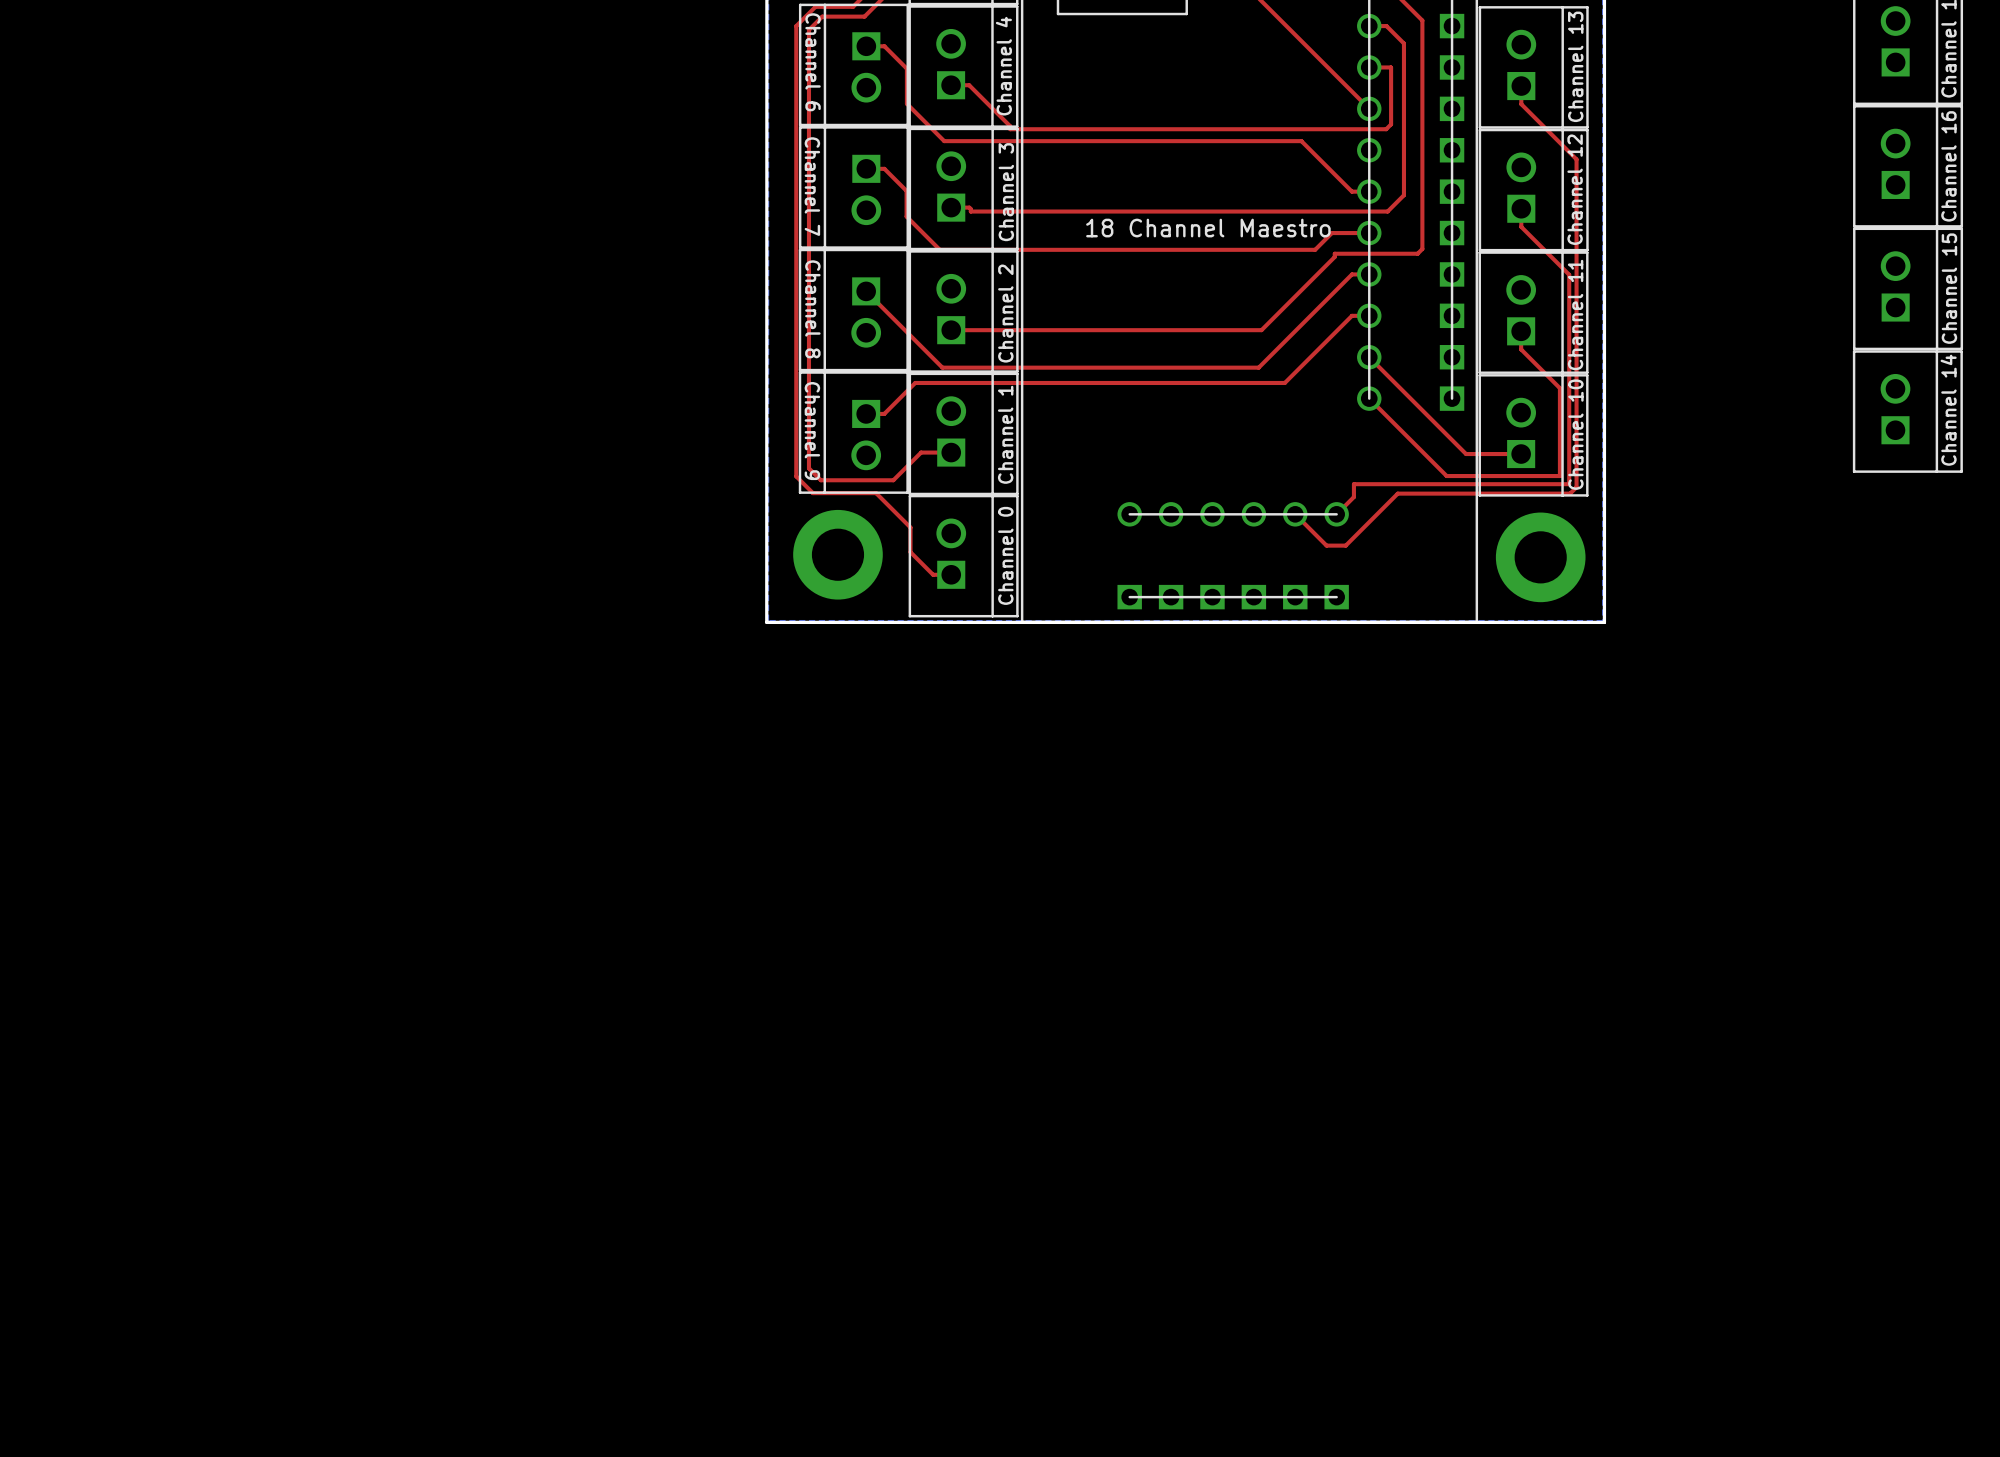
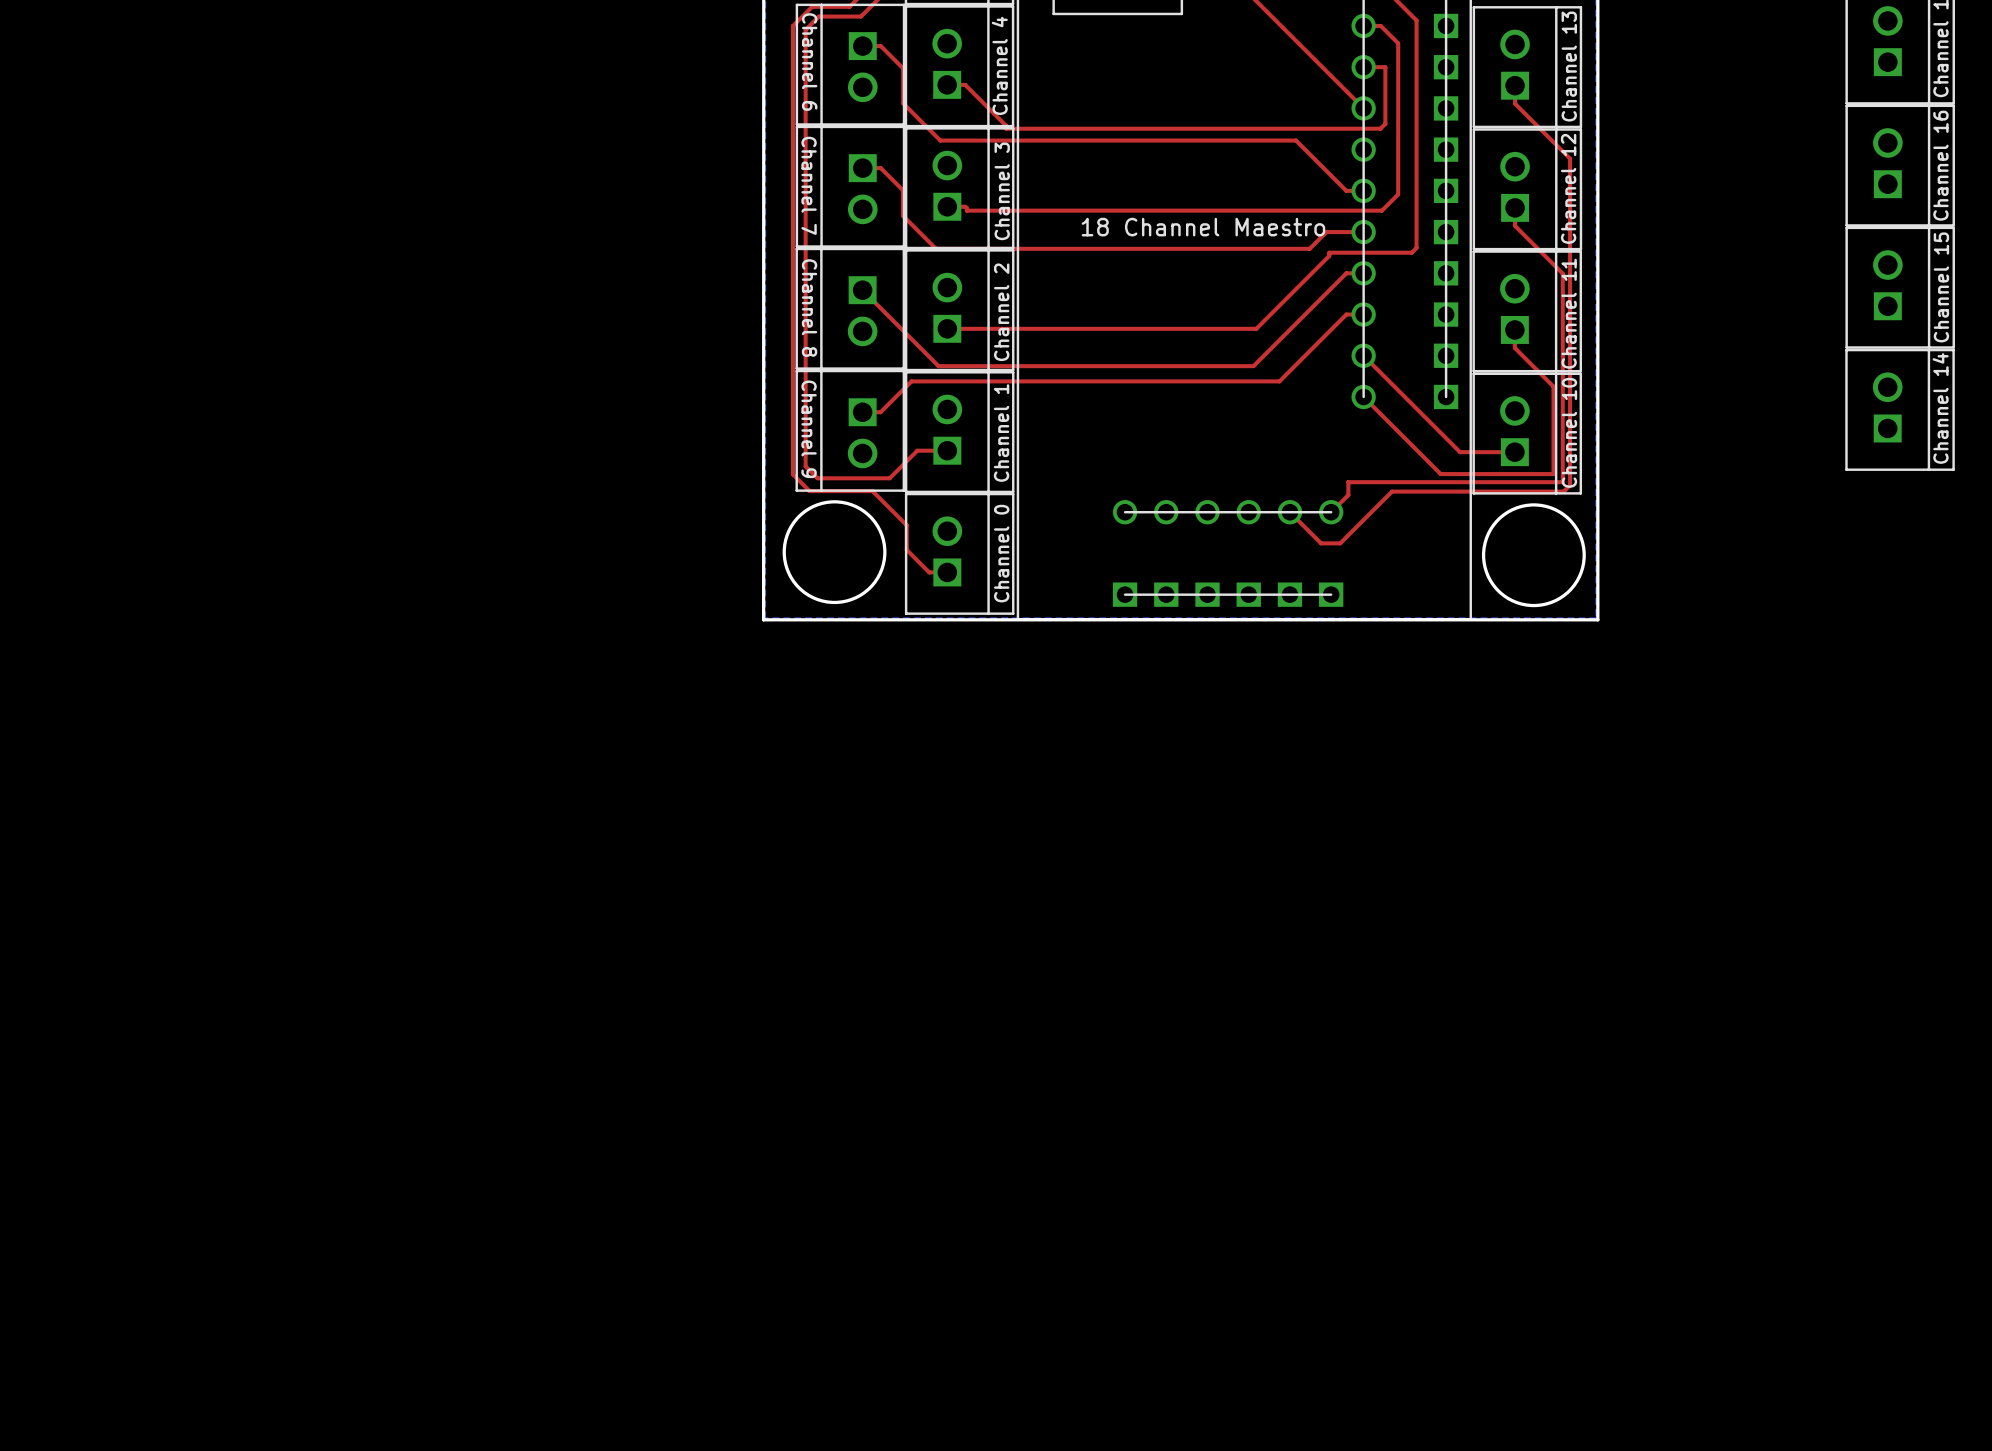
round board edge: none -> [782, 500, 887, 605]
round board edge: none -> [1481, 503, 1586, 608]
part: (837, 554) -> none
part: (1540, 557) -> none

